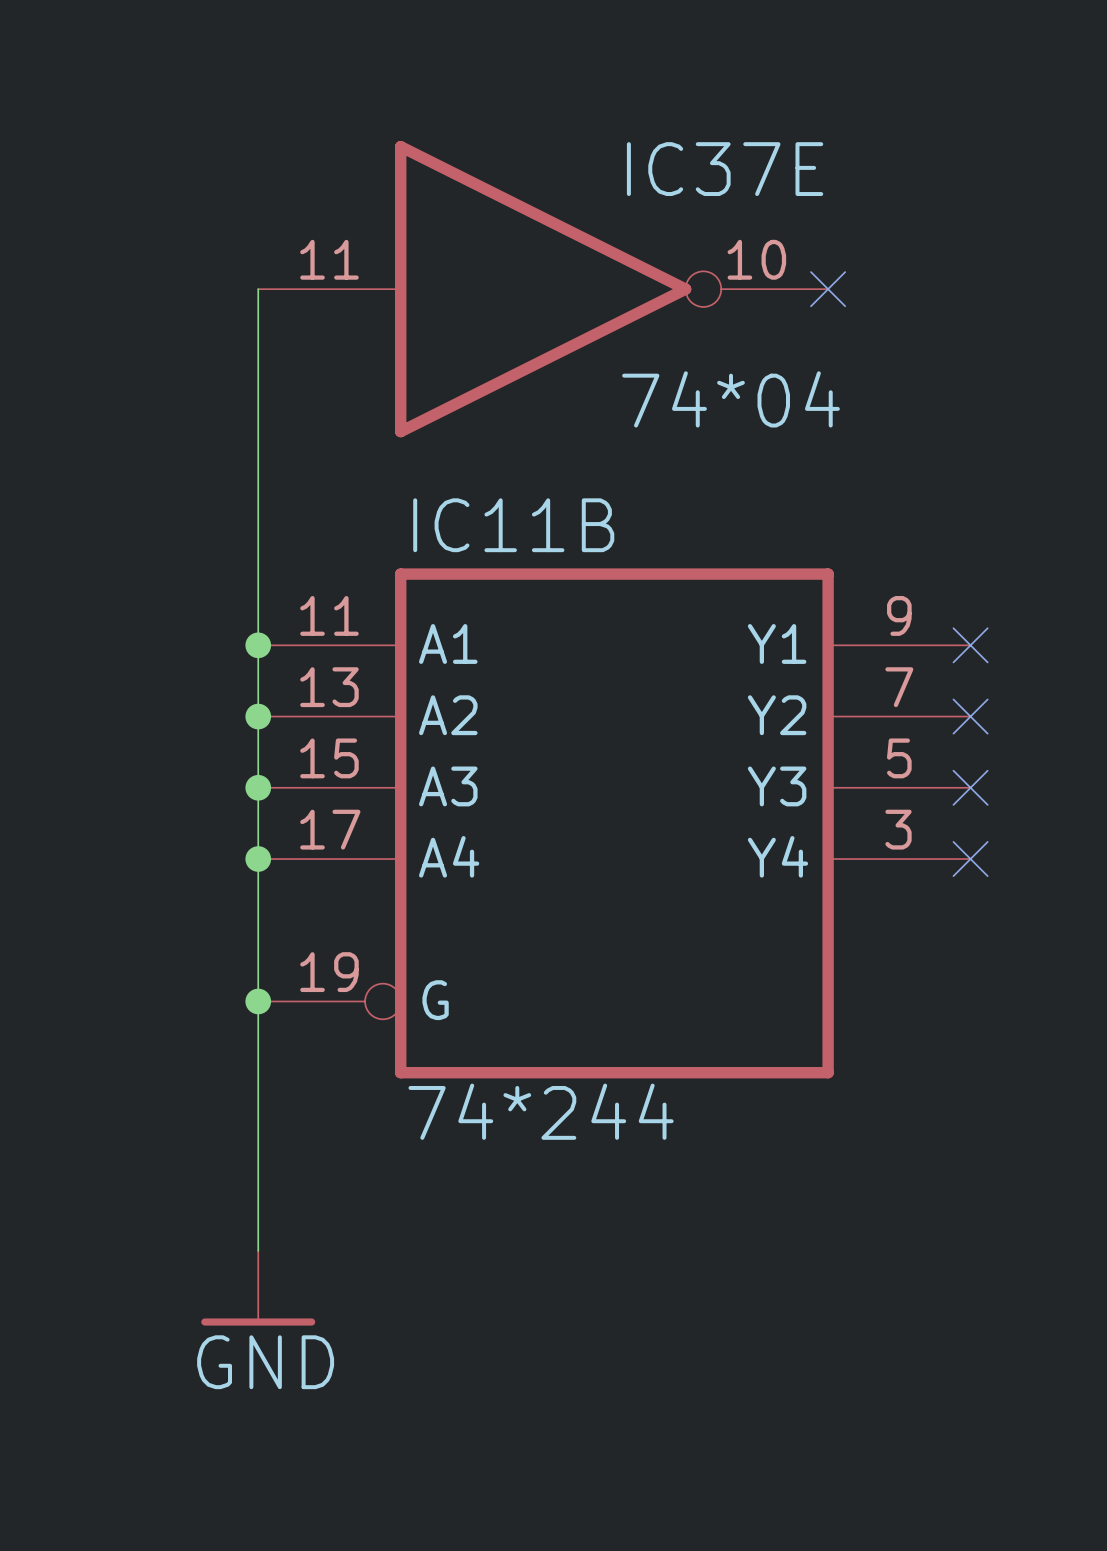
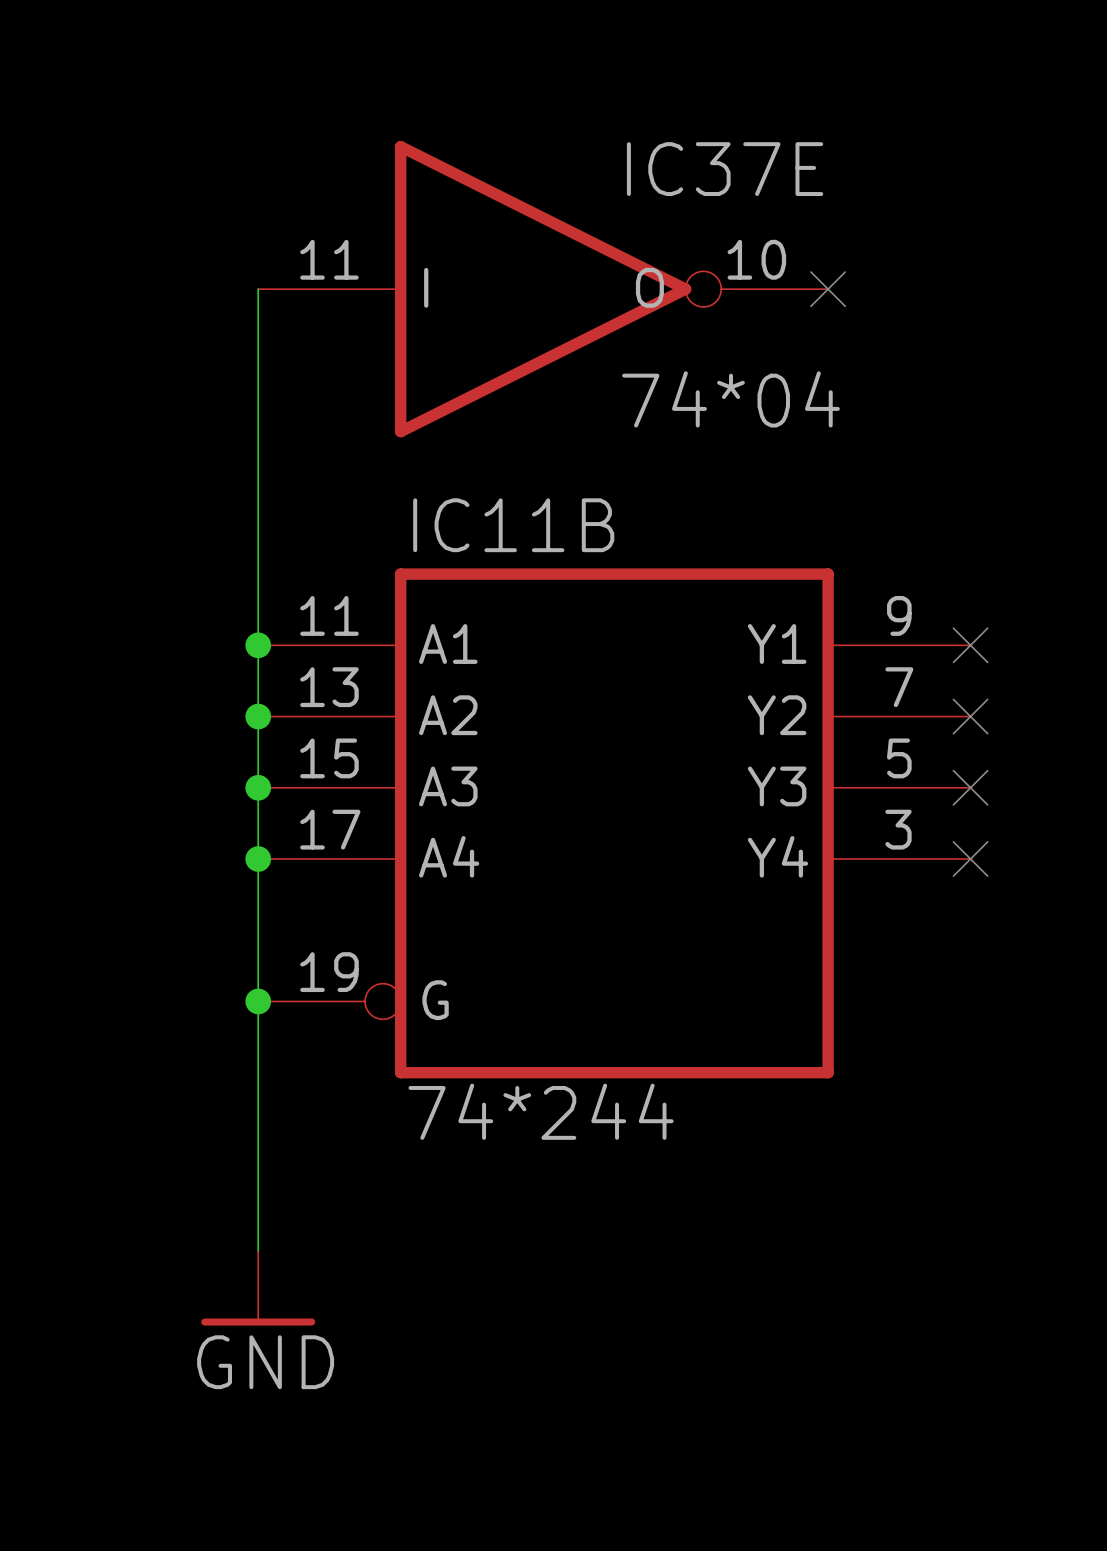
IC37E pin name: none -> I (426, 287)
IC37E pin name: none -> O (649, 287)

